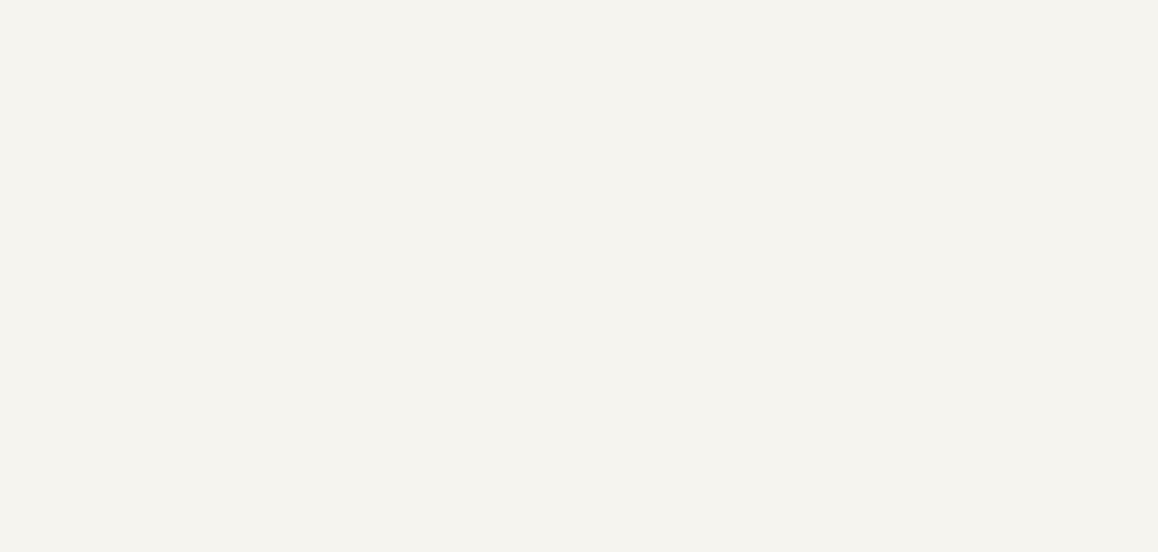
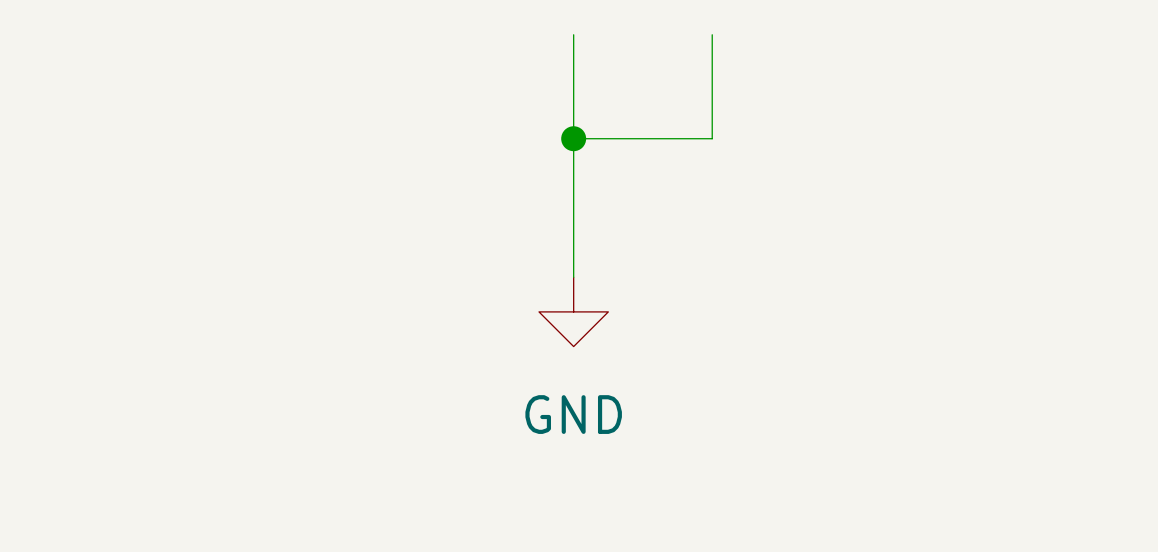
wire: none -> (573, 34) (573, 277)
wire: none -> (712, 34) (712, 138) (573, 138)
junction: none -> (573, 138)
power symbol: none -> GND (573, 311)

